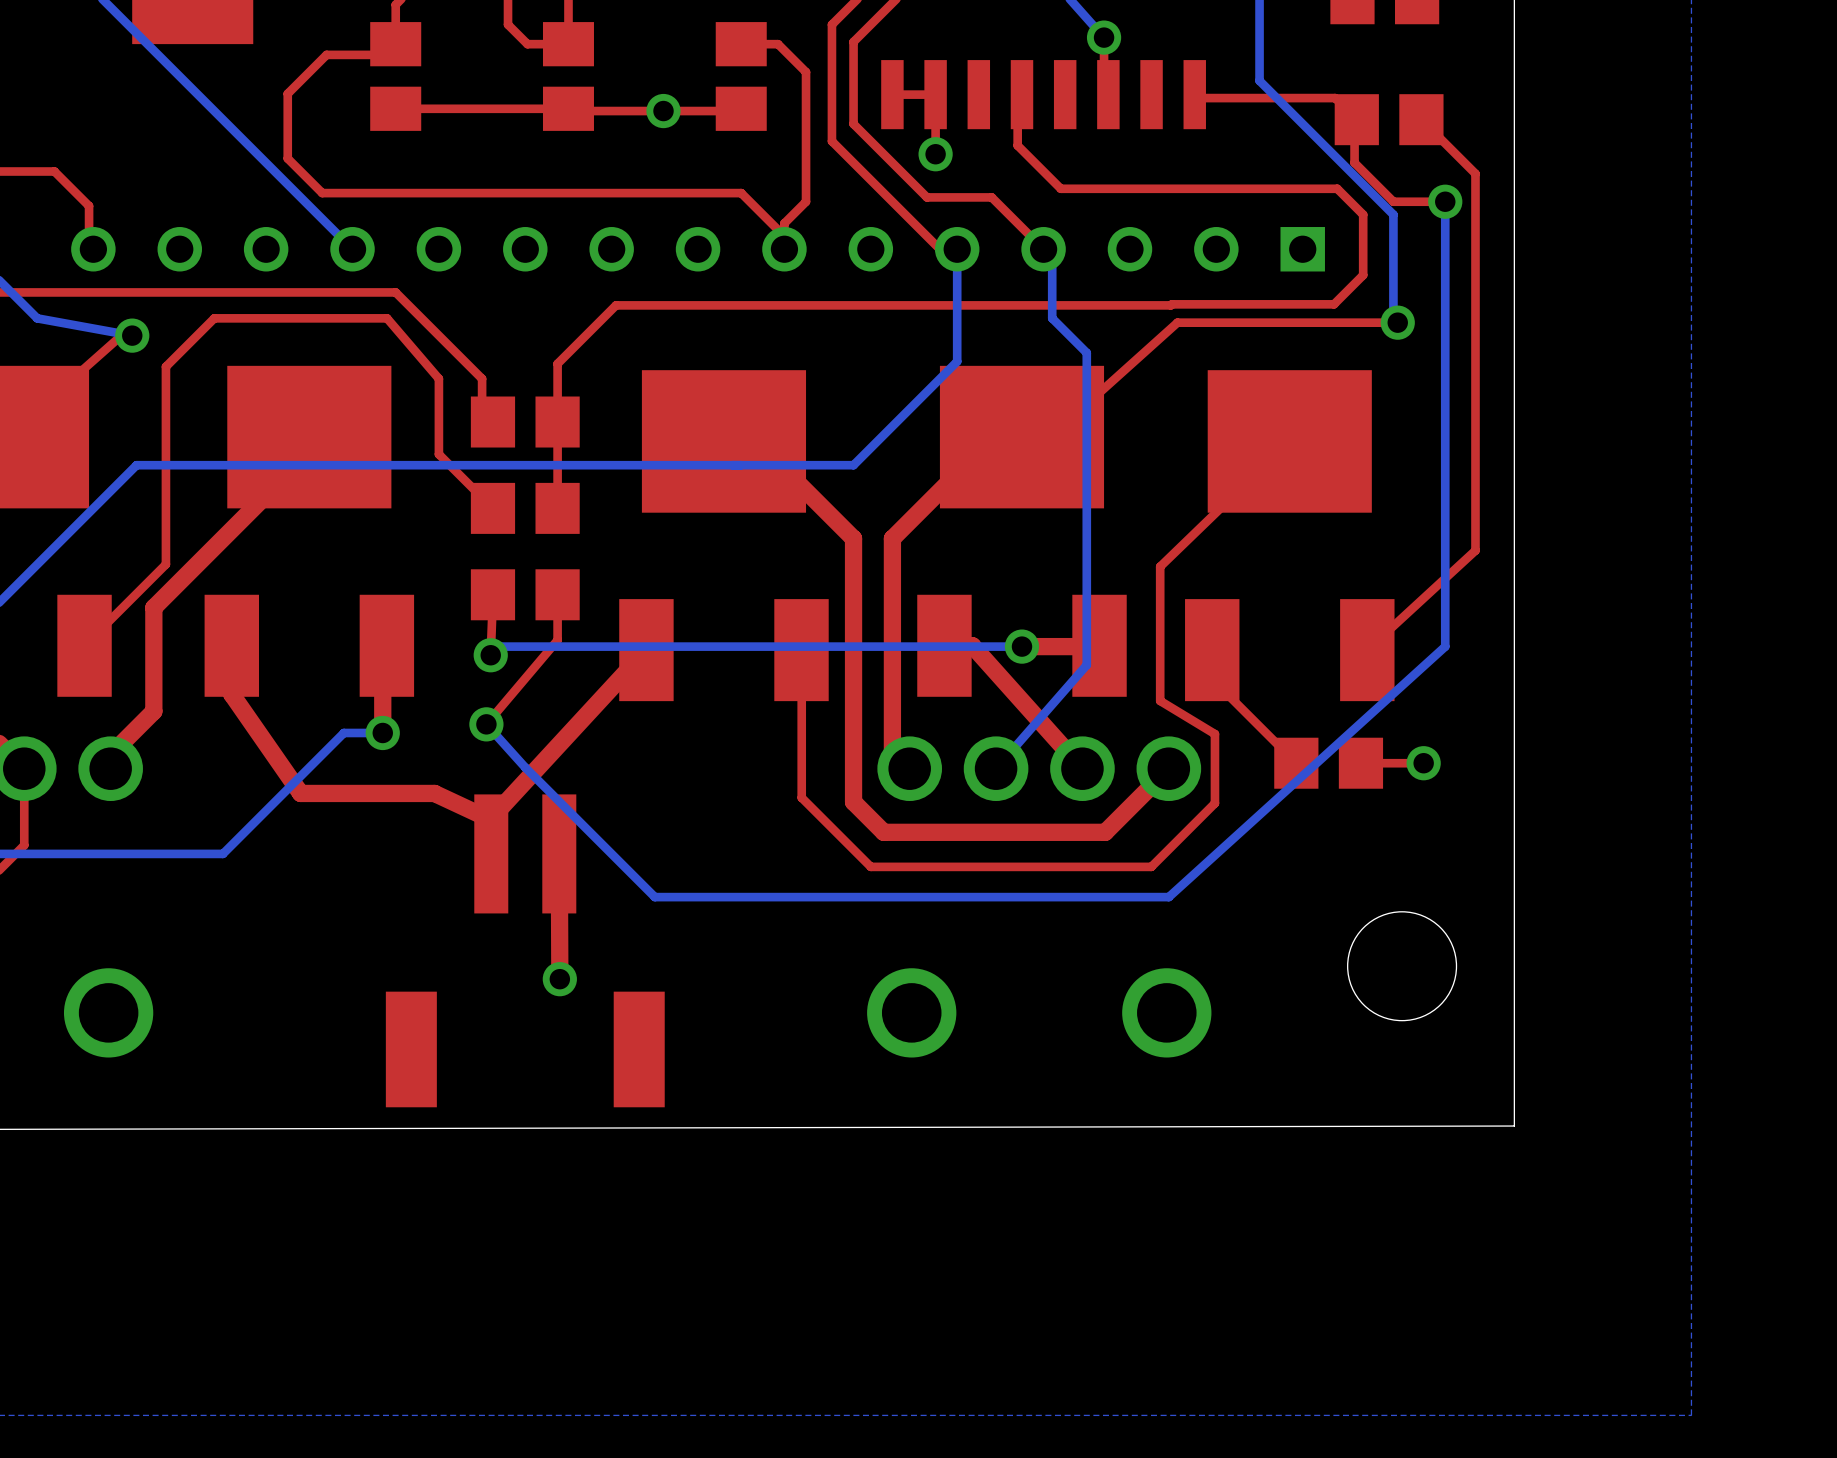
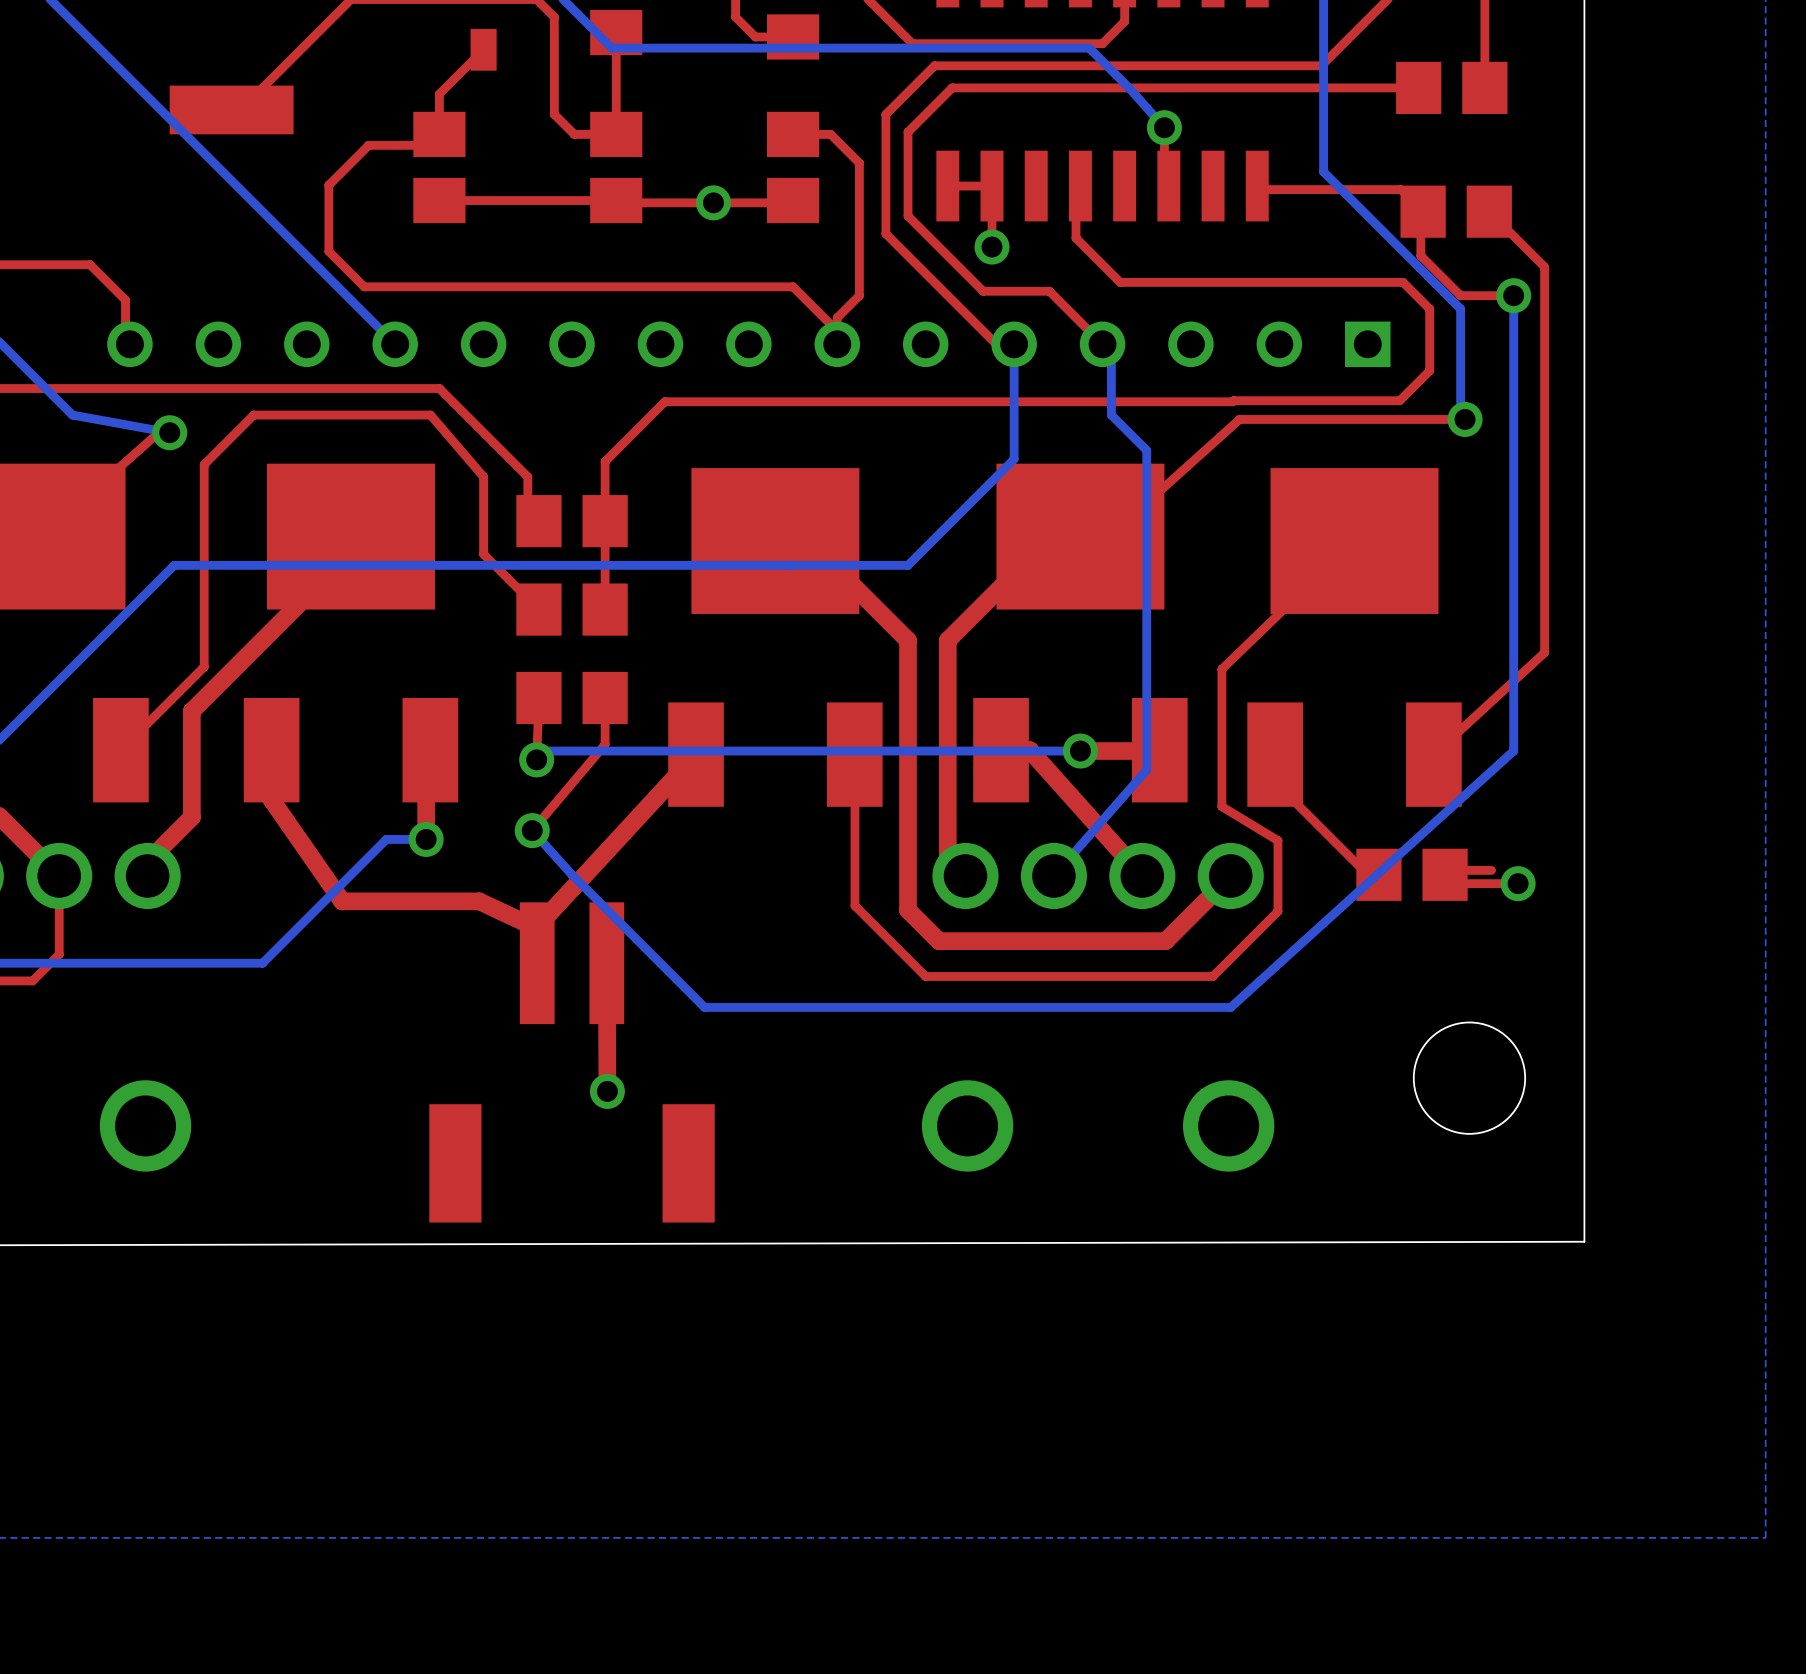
top track: (1216, 681) (1296, 763) -> (1279, 786) (1367, 874) (1378, 874)
part position: (1328, 763) -> (1412, 874)
via position: (1423, 763) -> (1518, 883)
top track: none -> (1445, 874) (1456, 885) (1458, 883) (1518, 883)

